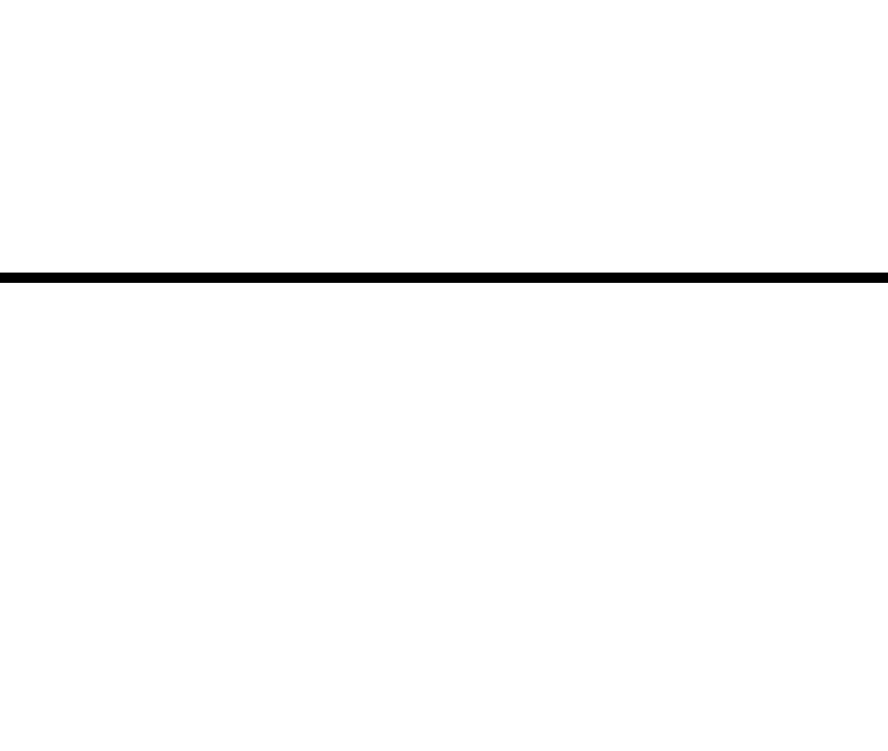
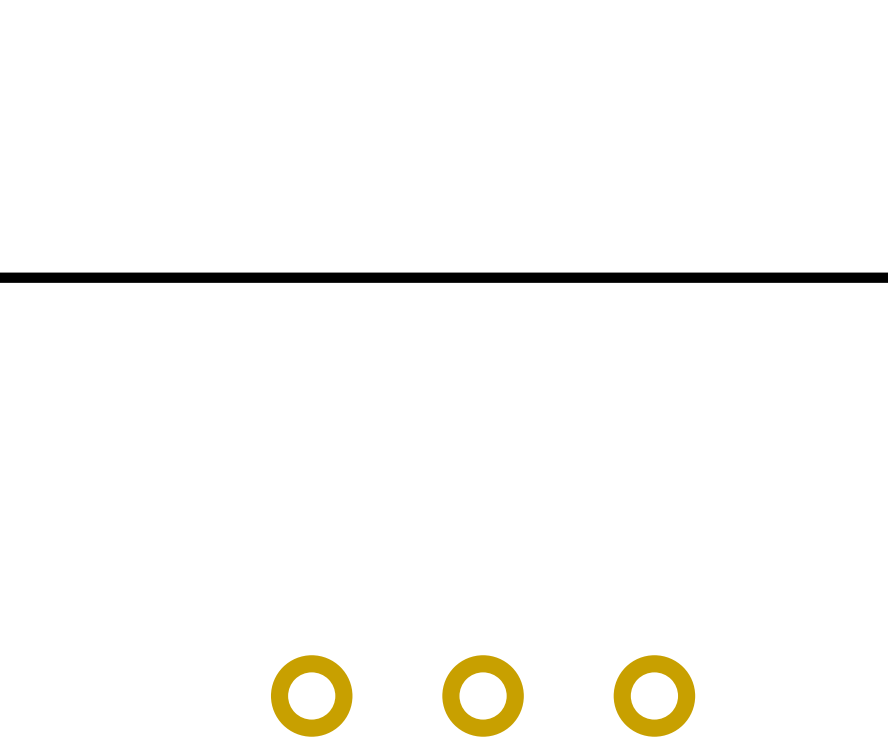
part: none -> (483, 695)

